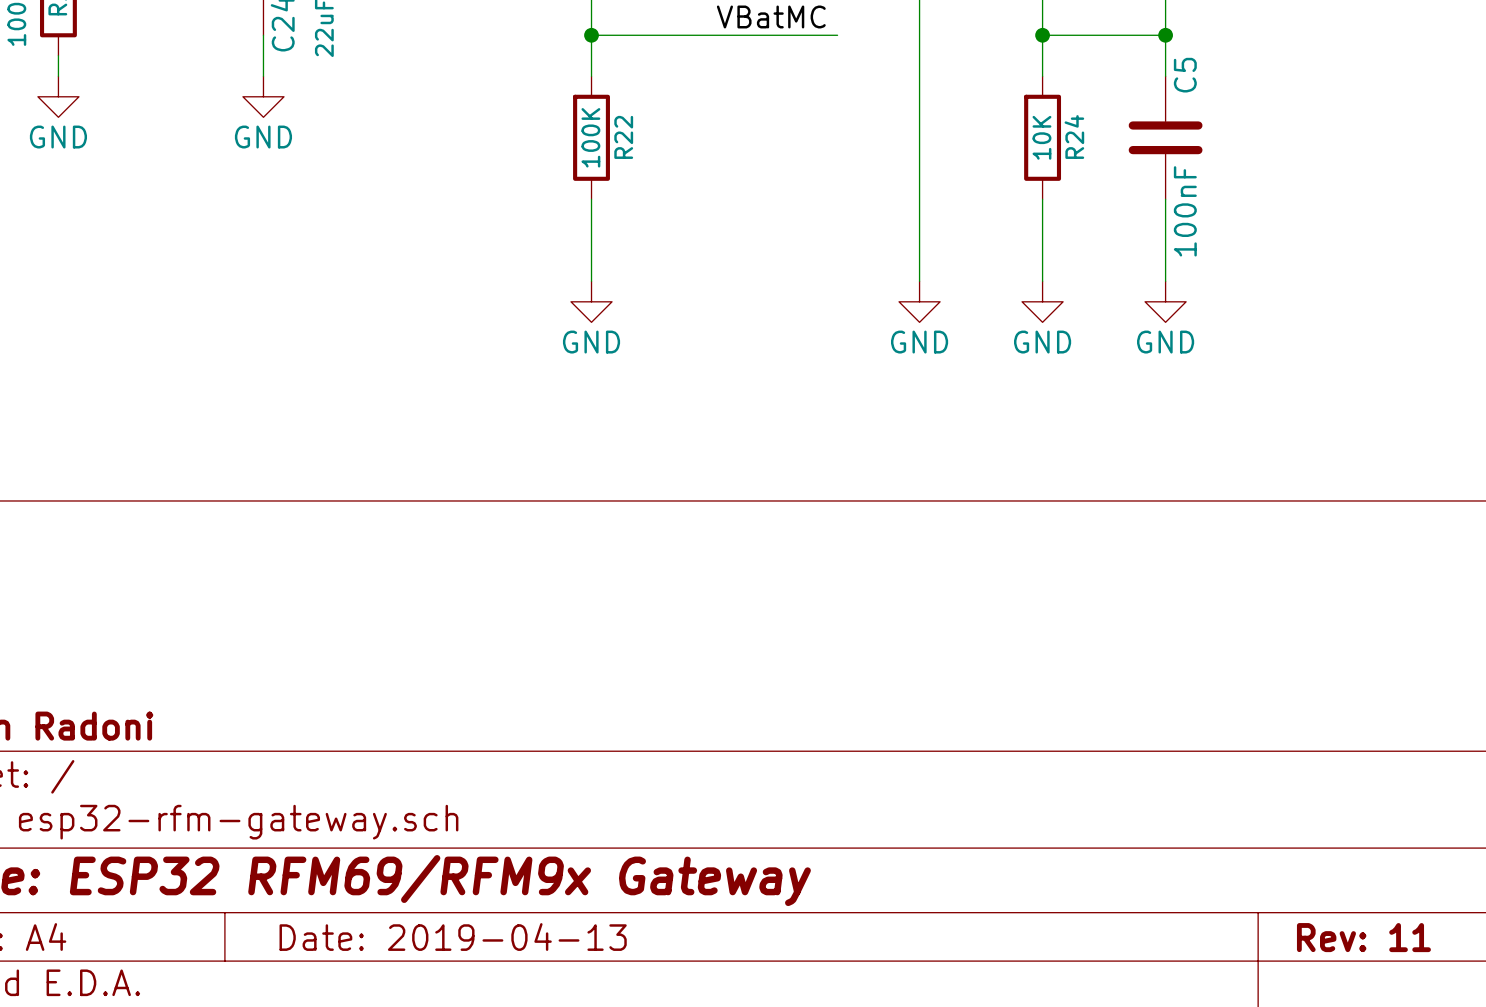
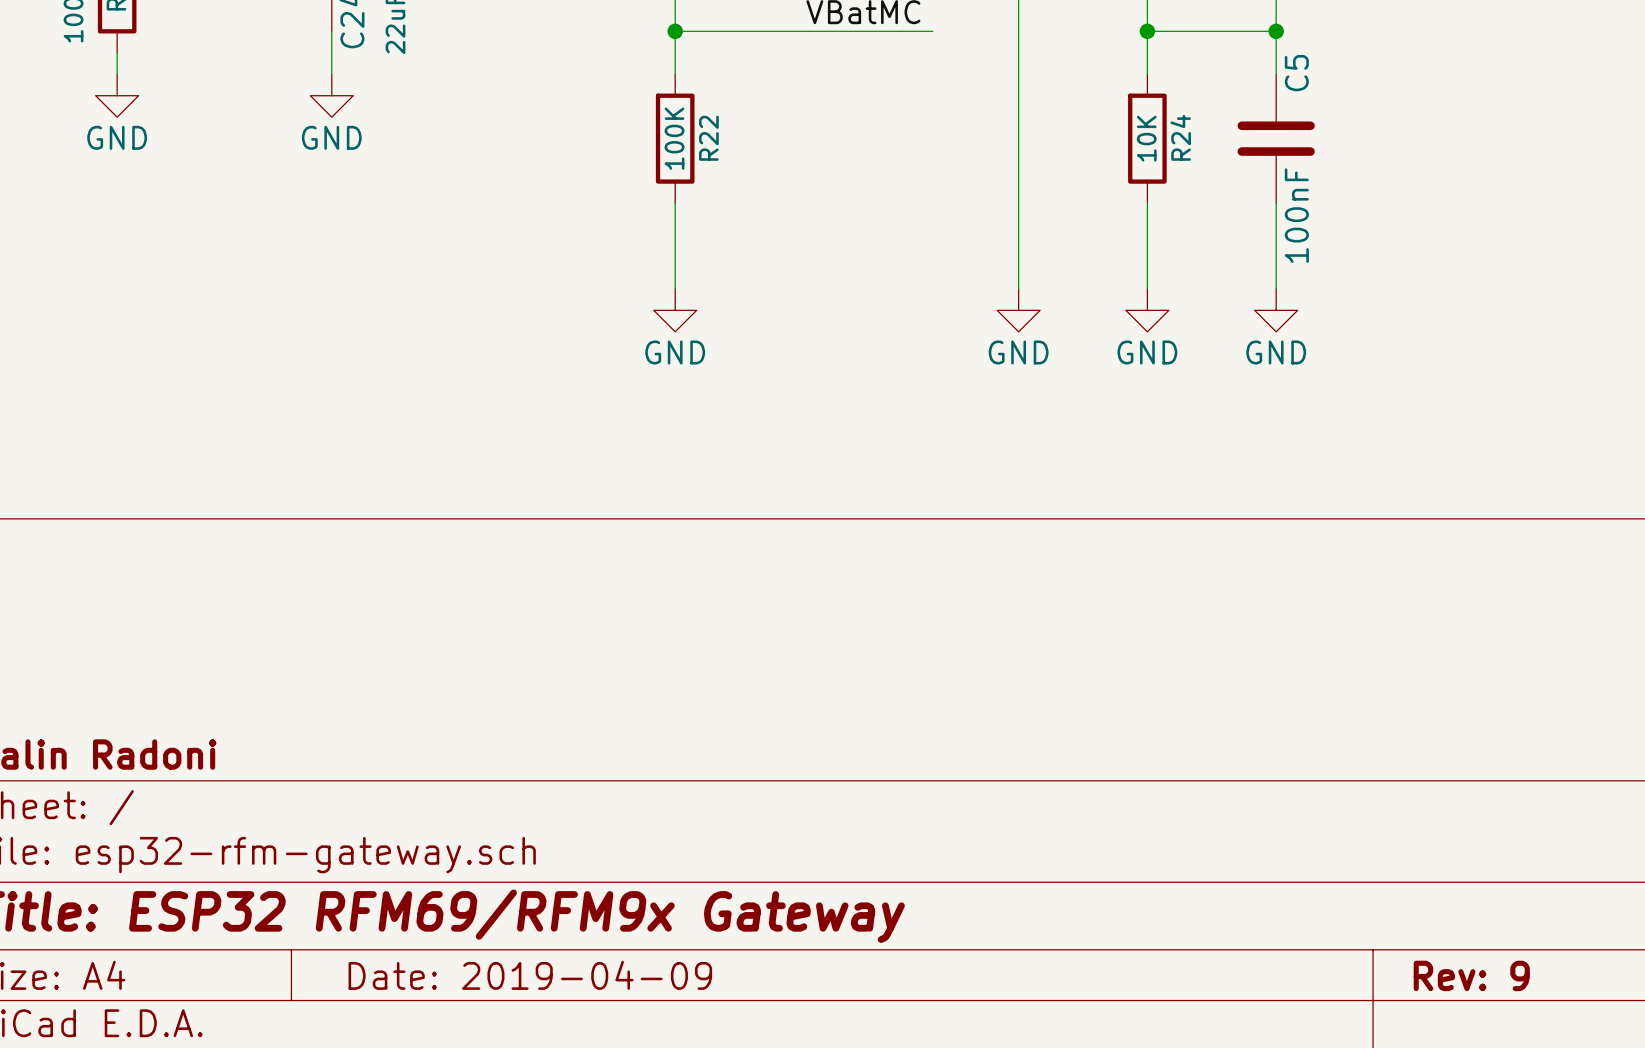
title block: Date: 2019-04-13 (453, 937) -> Date: 2019-04-09 (530, 975)
title block: Rev: 11 (1363, 937) -> Rev: 9 (1471, 975)

